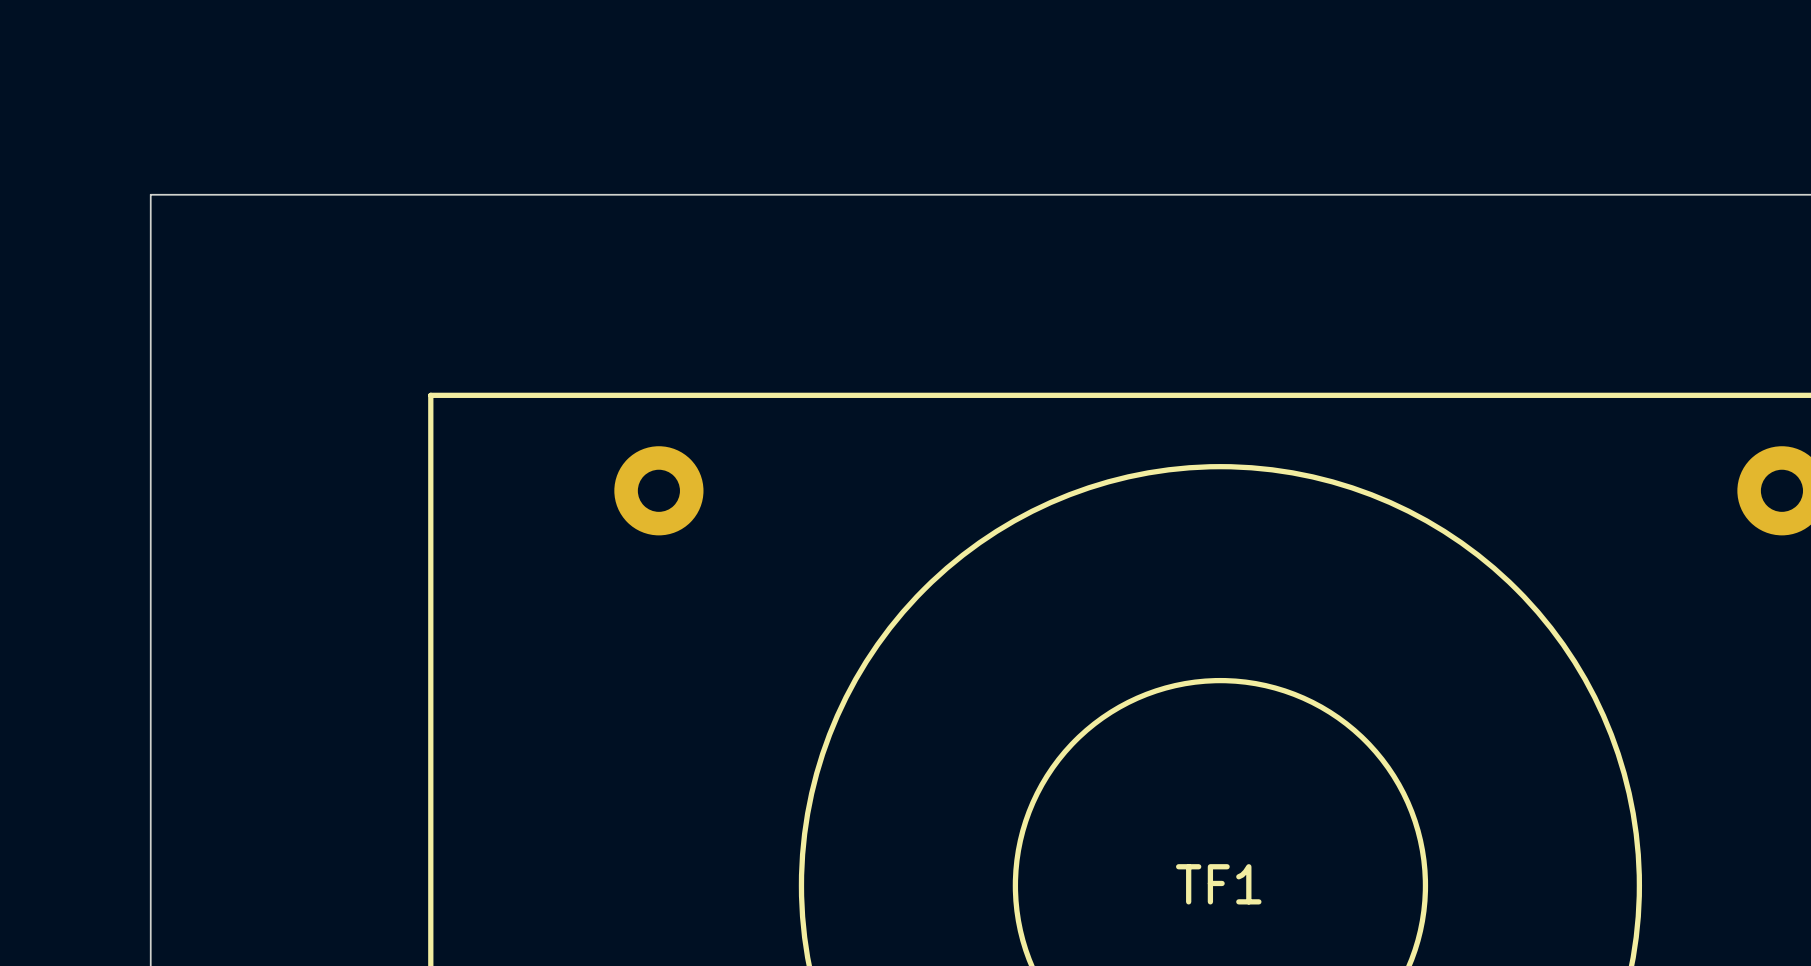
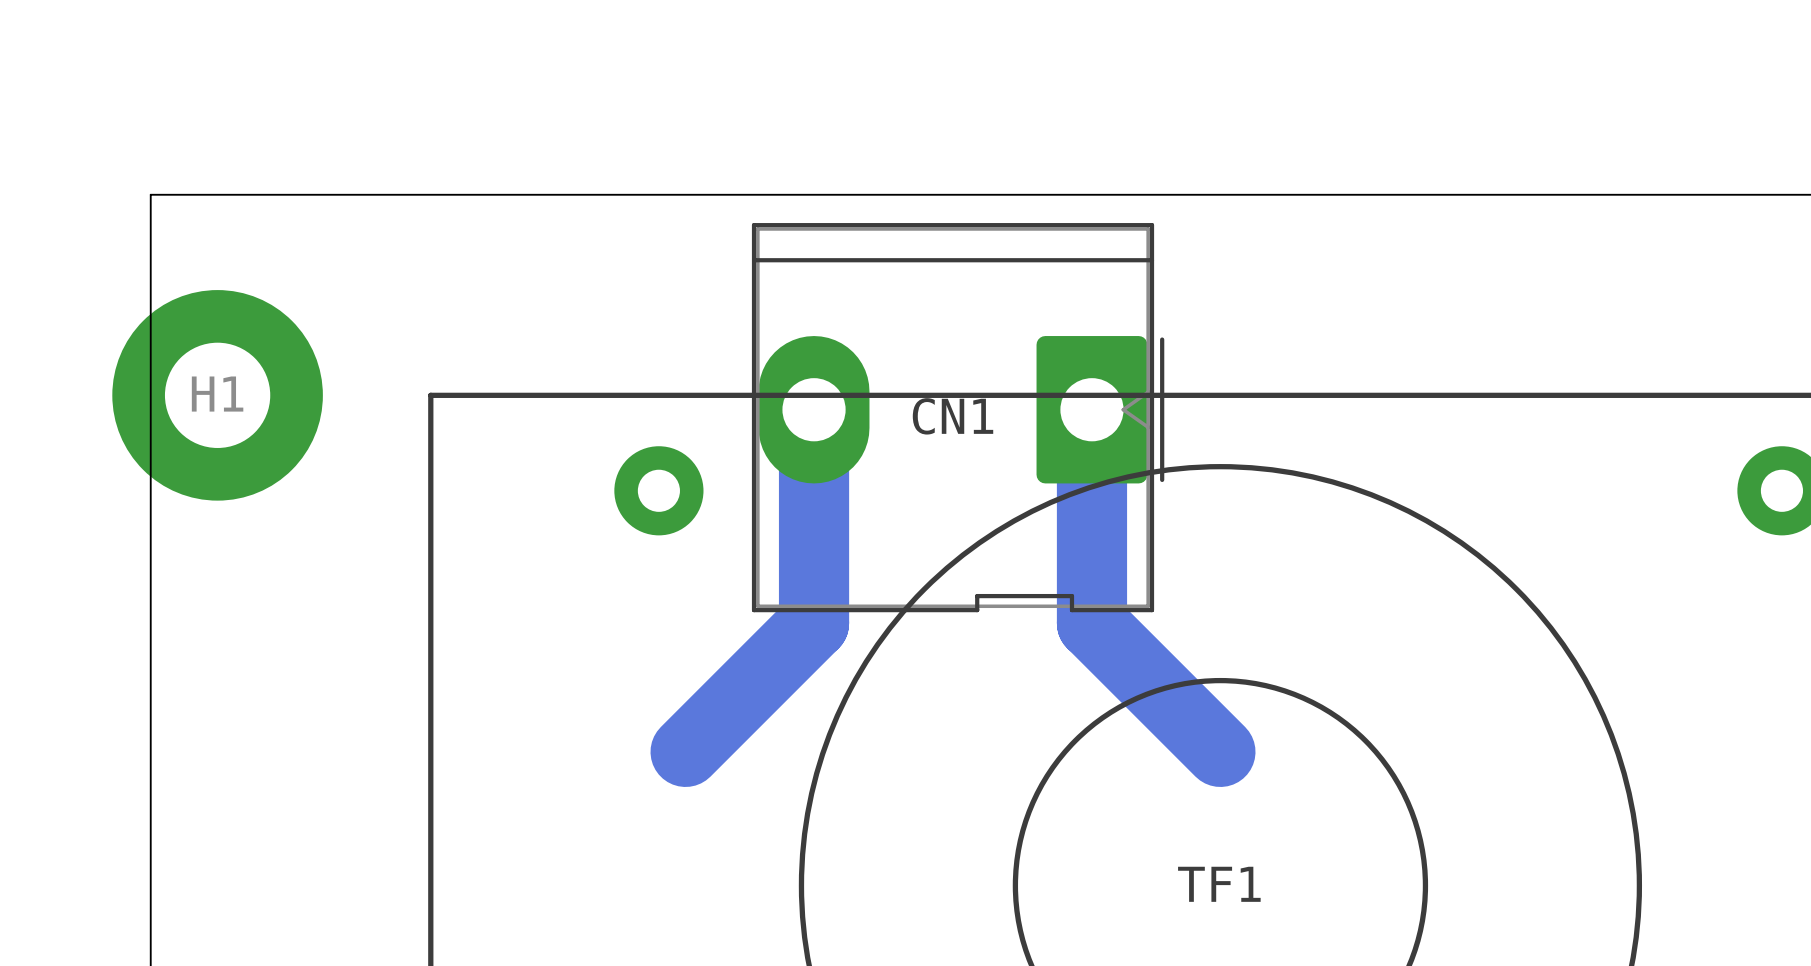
H1: none -> (217, 395)
bottom track: none -> (814, 409) (814, 623) (685, 751)
bottom track: none -> (1091, 409) (1091, 623) (1220, 751)
CN1: none -> (958, 417)

